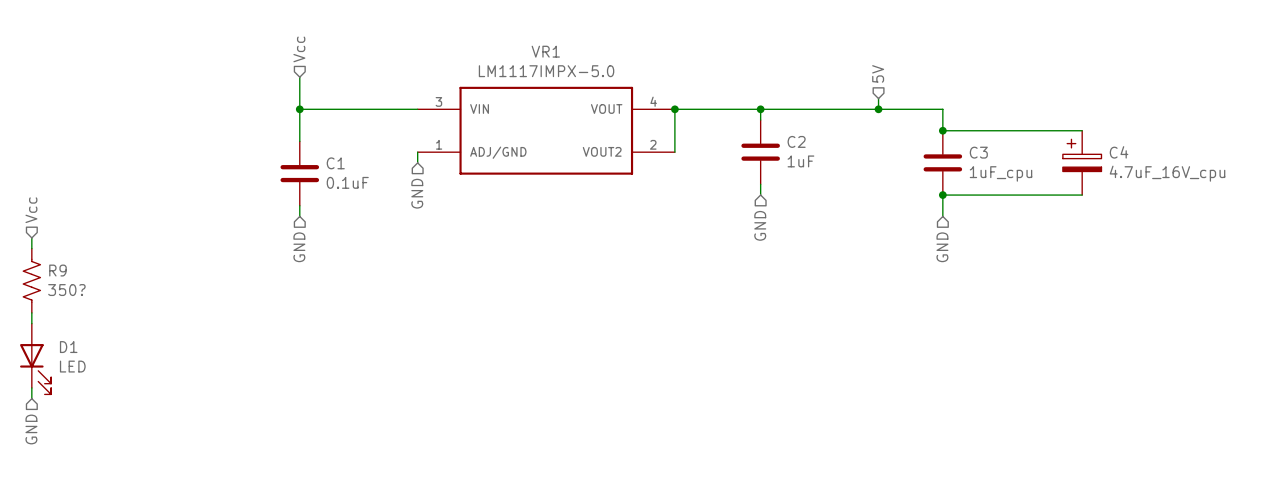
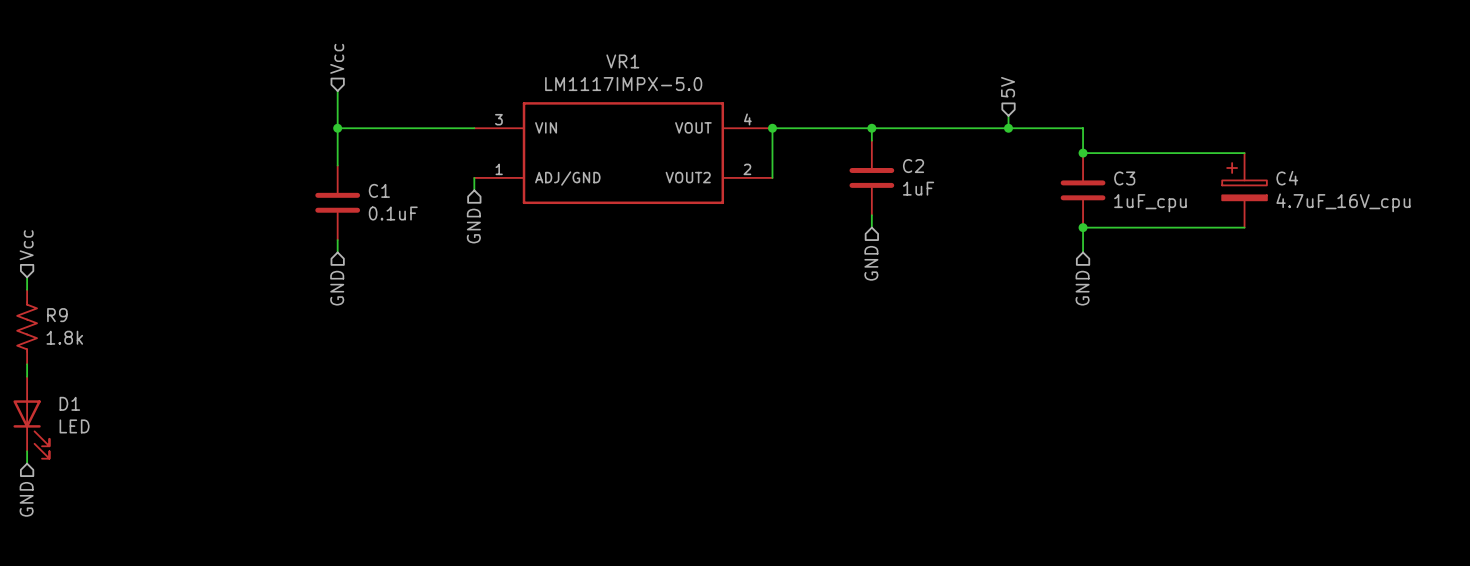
R9 value: 350? (66, 290) -> 1.8k (64, 337)

